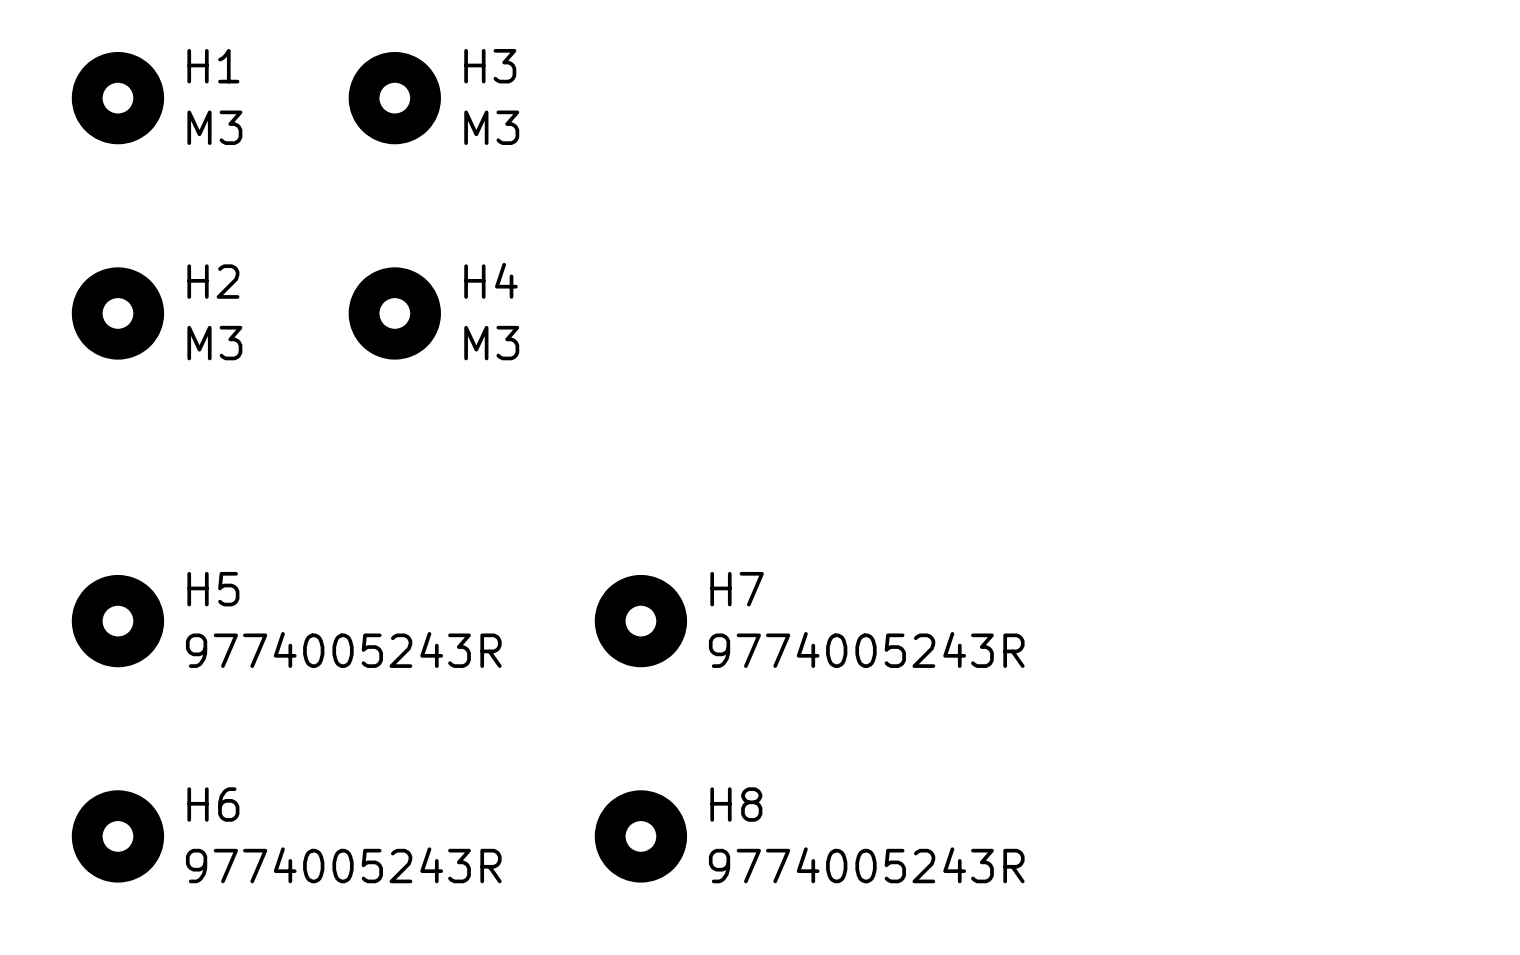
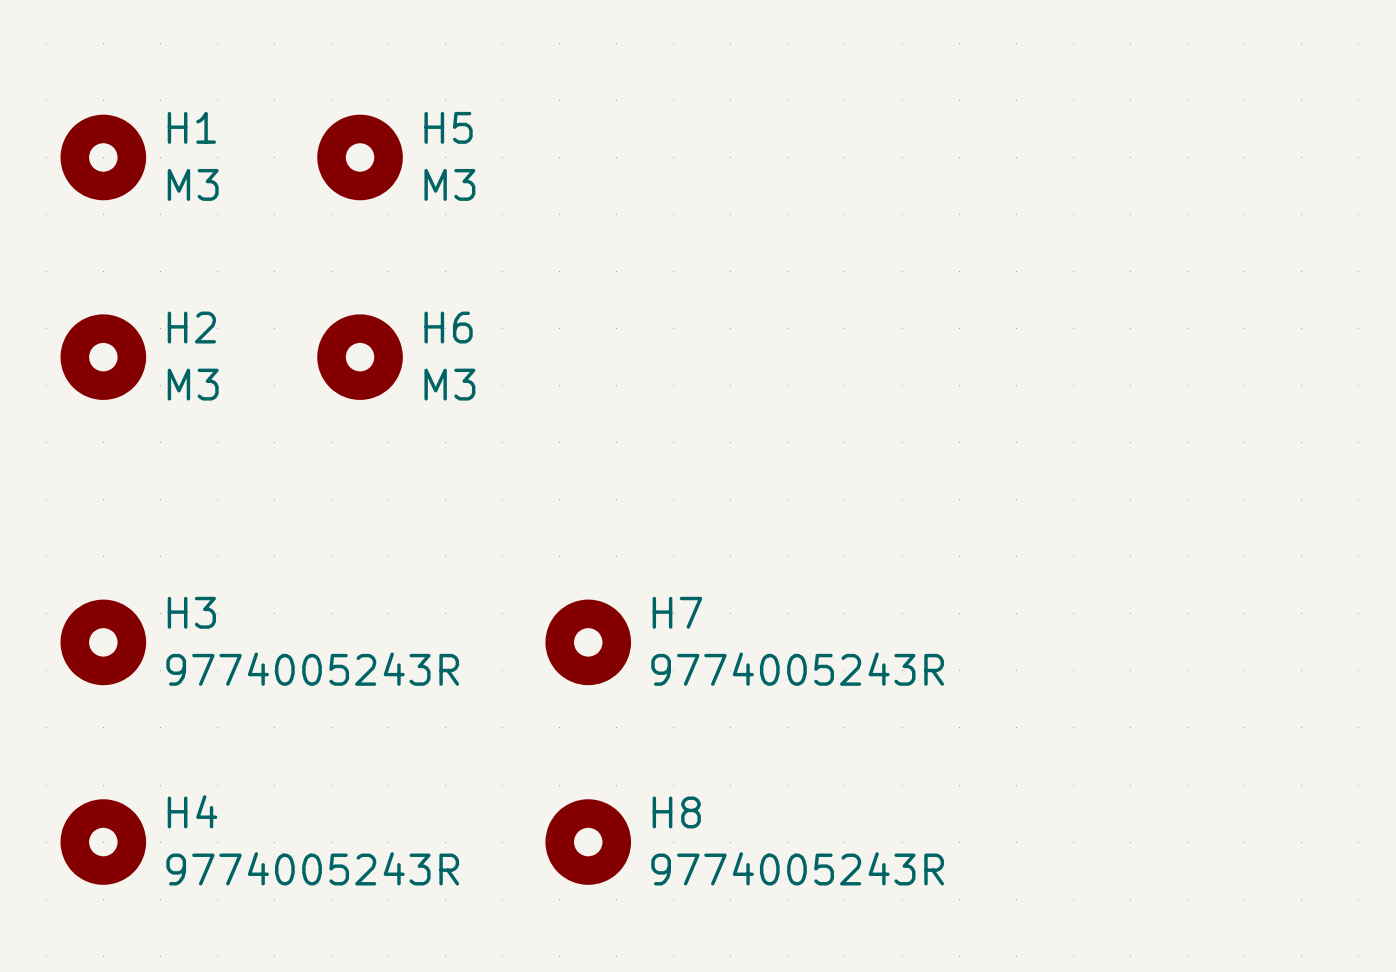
H3 name: H3 (490, 66) -> H5 (448, 127)
H4 name: H4 (491, 280) -> H6 (448, 327)
H5 name: H5 (213, 589) -> H3 (191, 612)
H6 name: H6 (213, 804) -> H4 (192, 811)

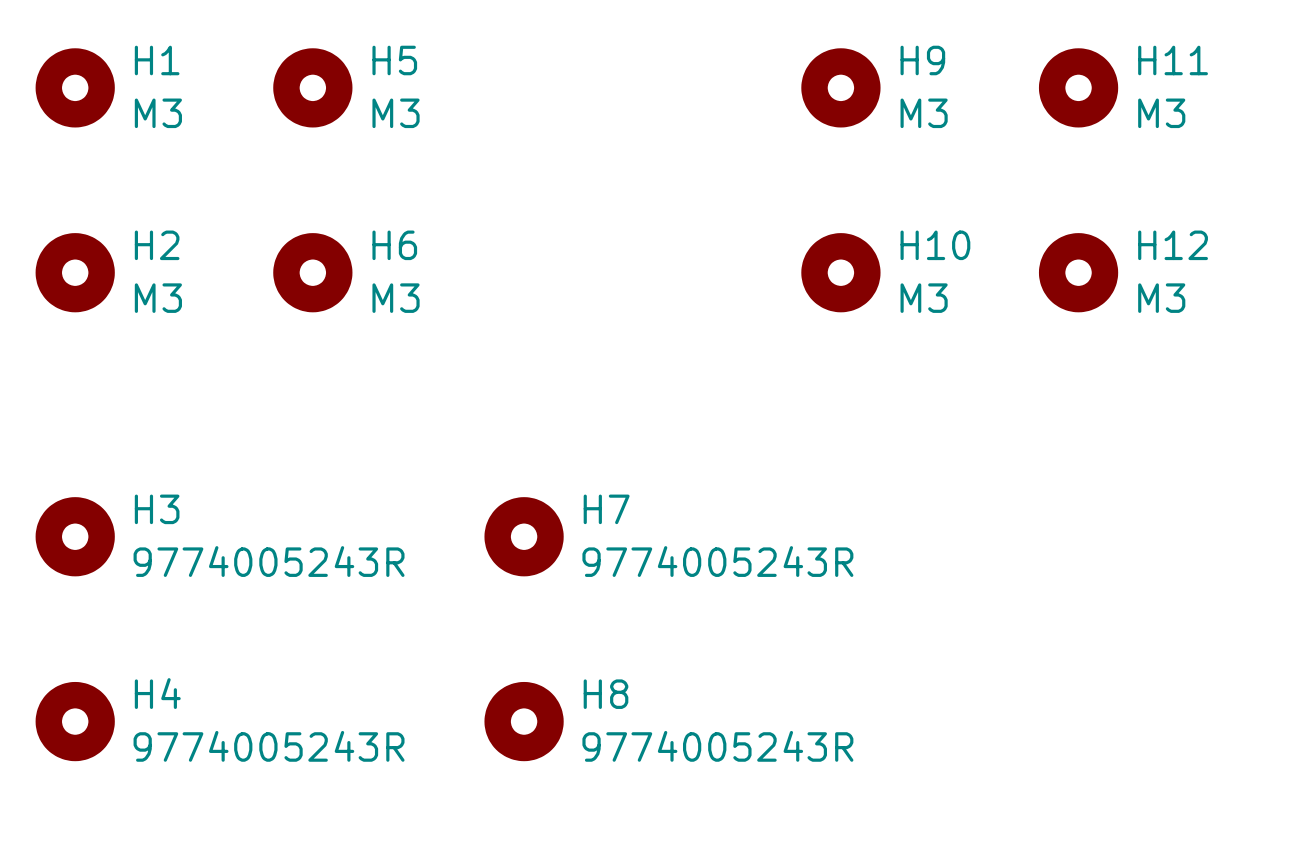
H9: none -> M3 (840, 87)
H11: none -> M3 (1078, 87)
H10: none -> M3 (840, 272)
H12: none -> M3 (1078, 272)

